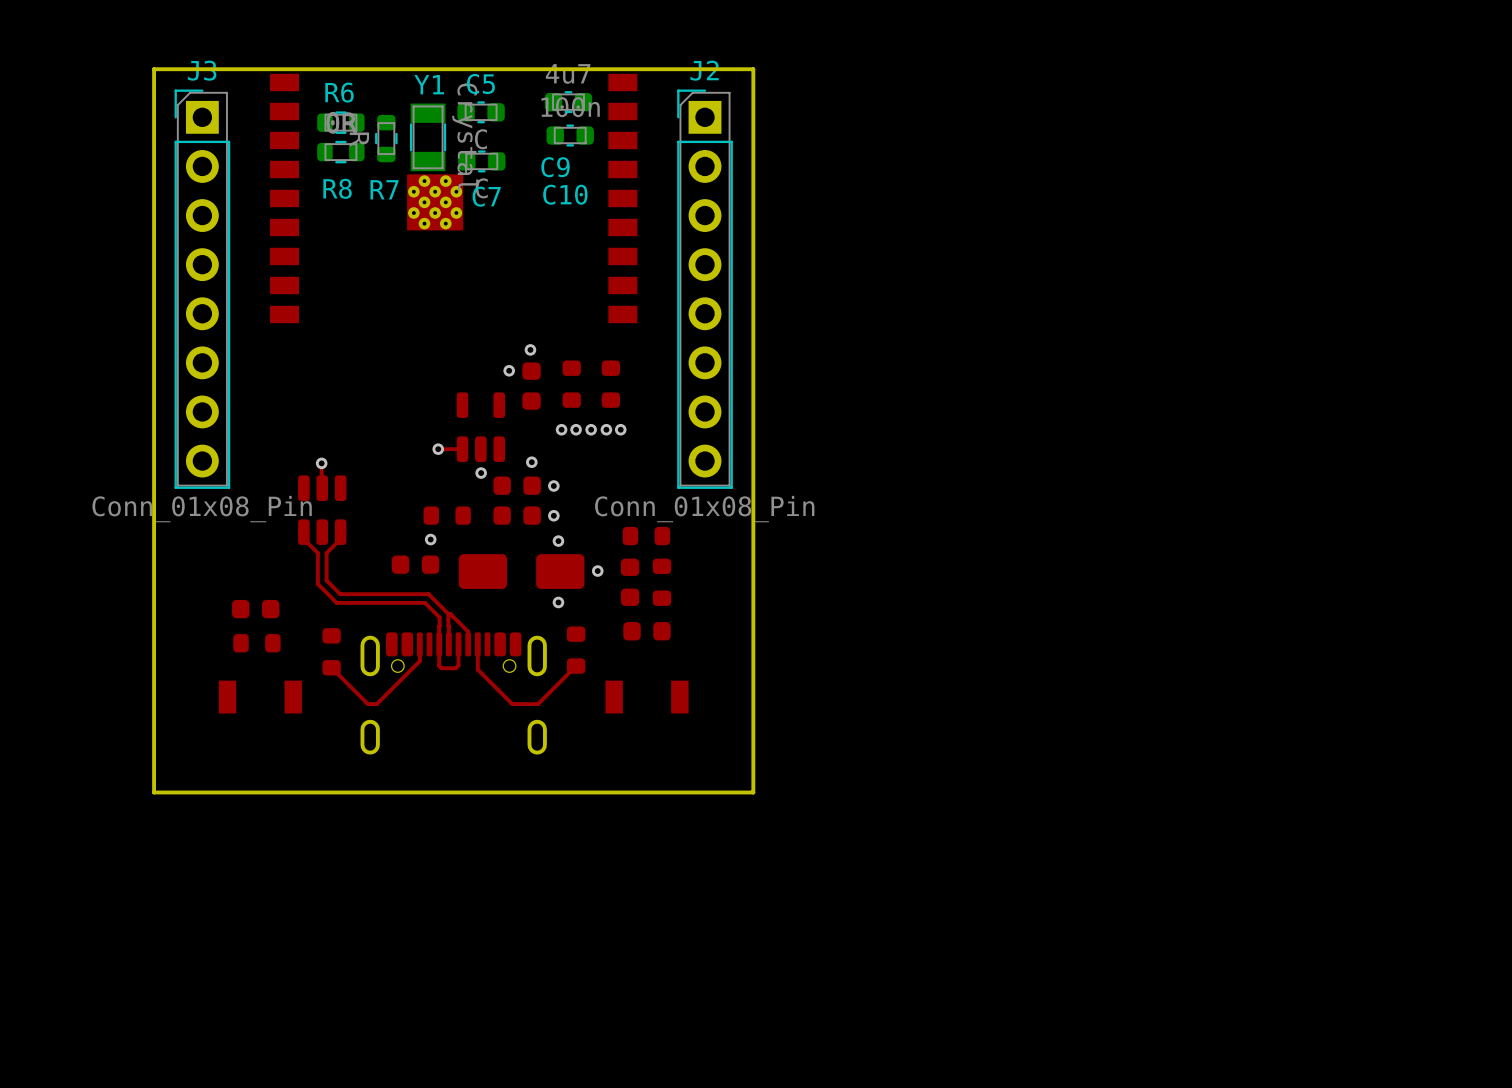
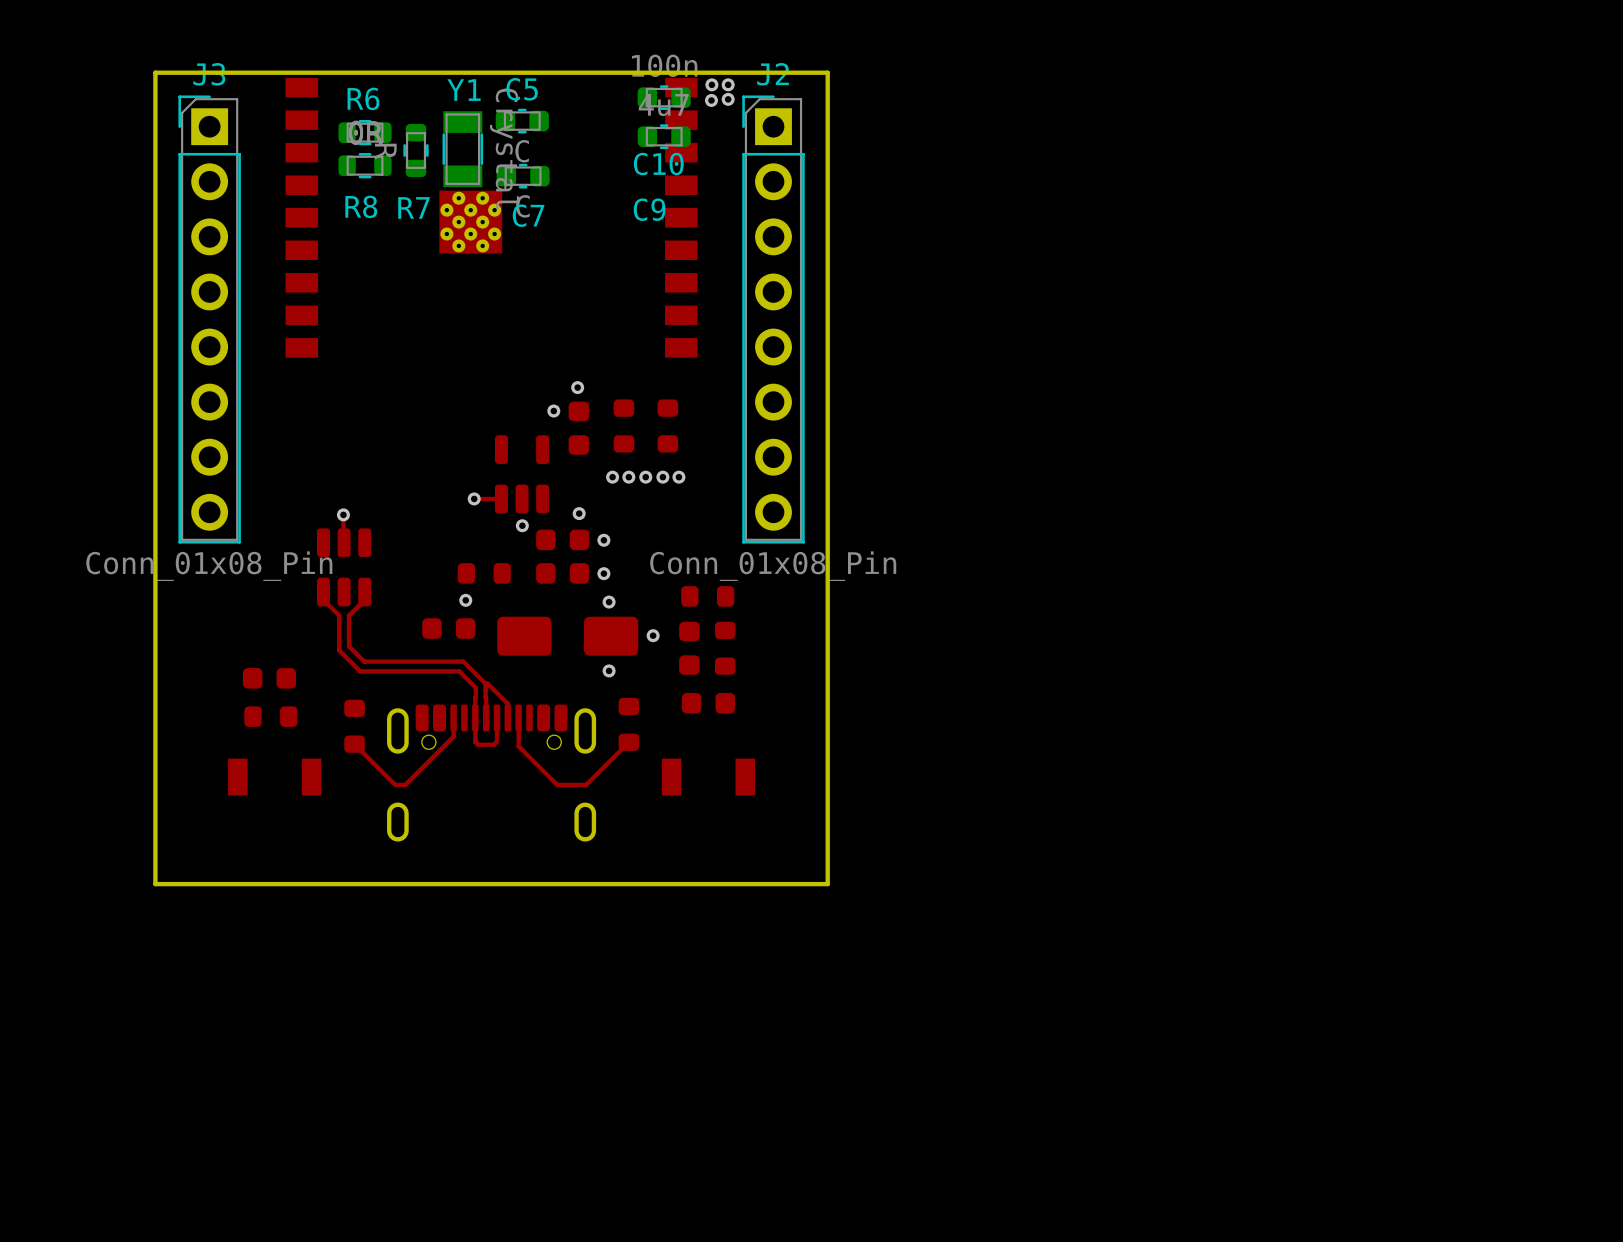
via: none -> (711, 84)
via: none -> (728, 84)
via: none -> (728, 99)
via: none -> (711, 100)
C9 position: (568, 102) -> (664, 136)
C10 position: (570, 135) -> (664, 97)

